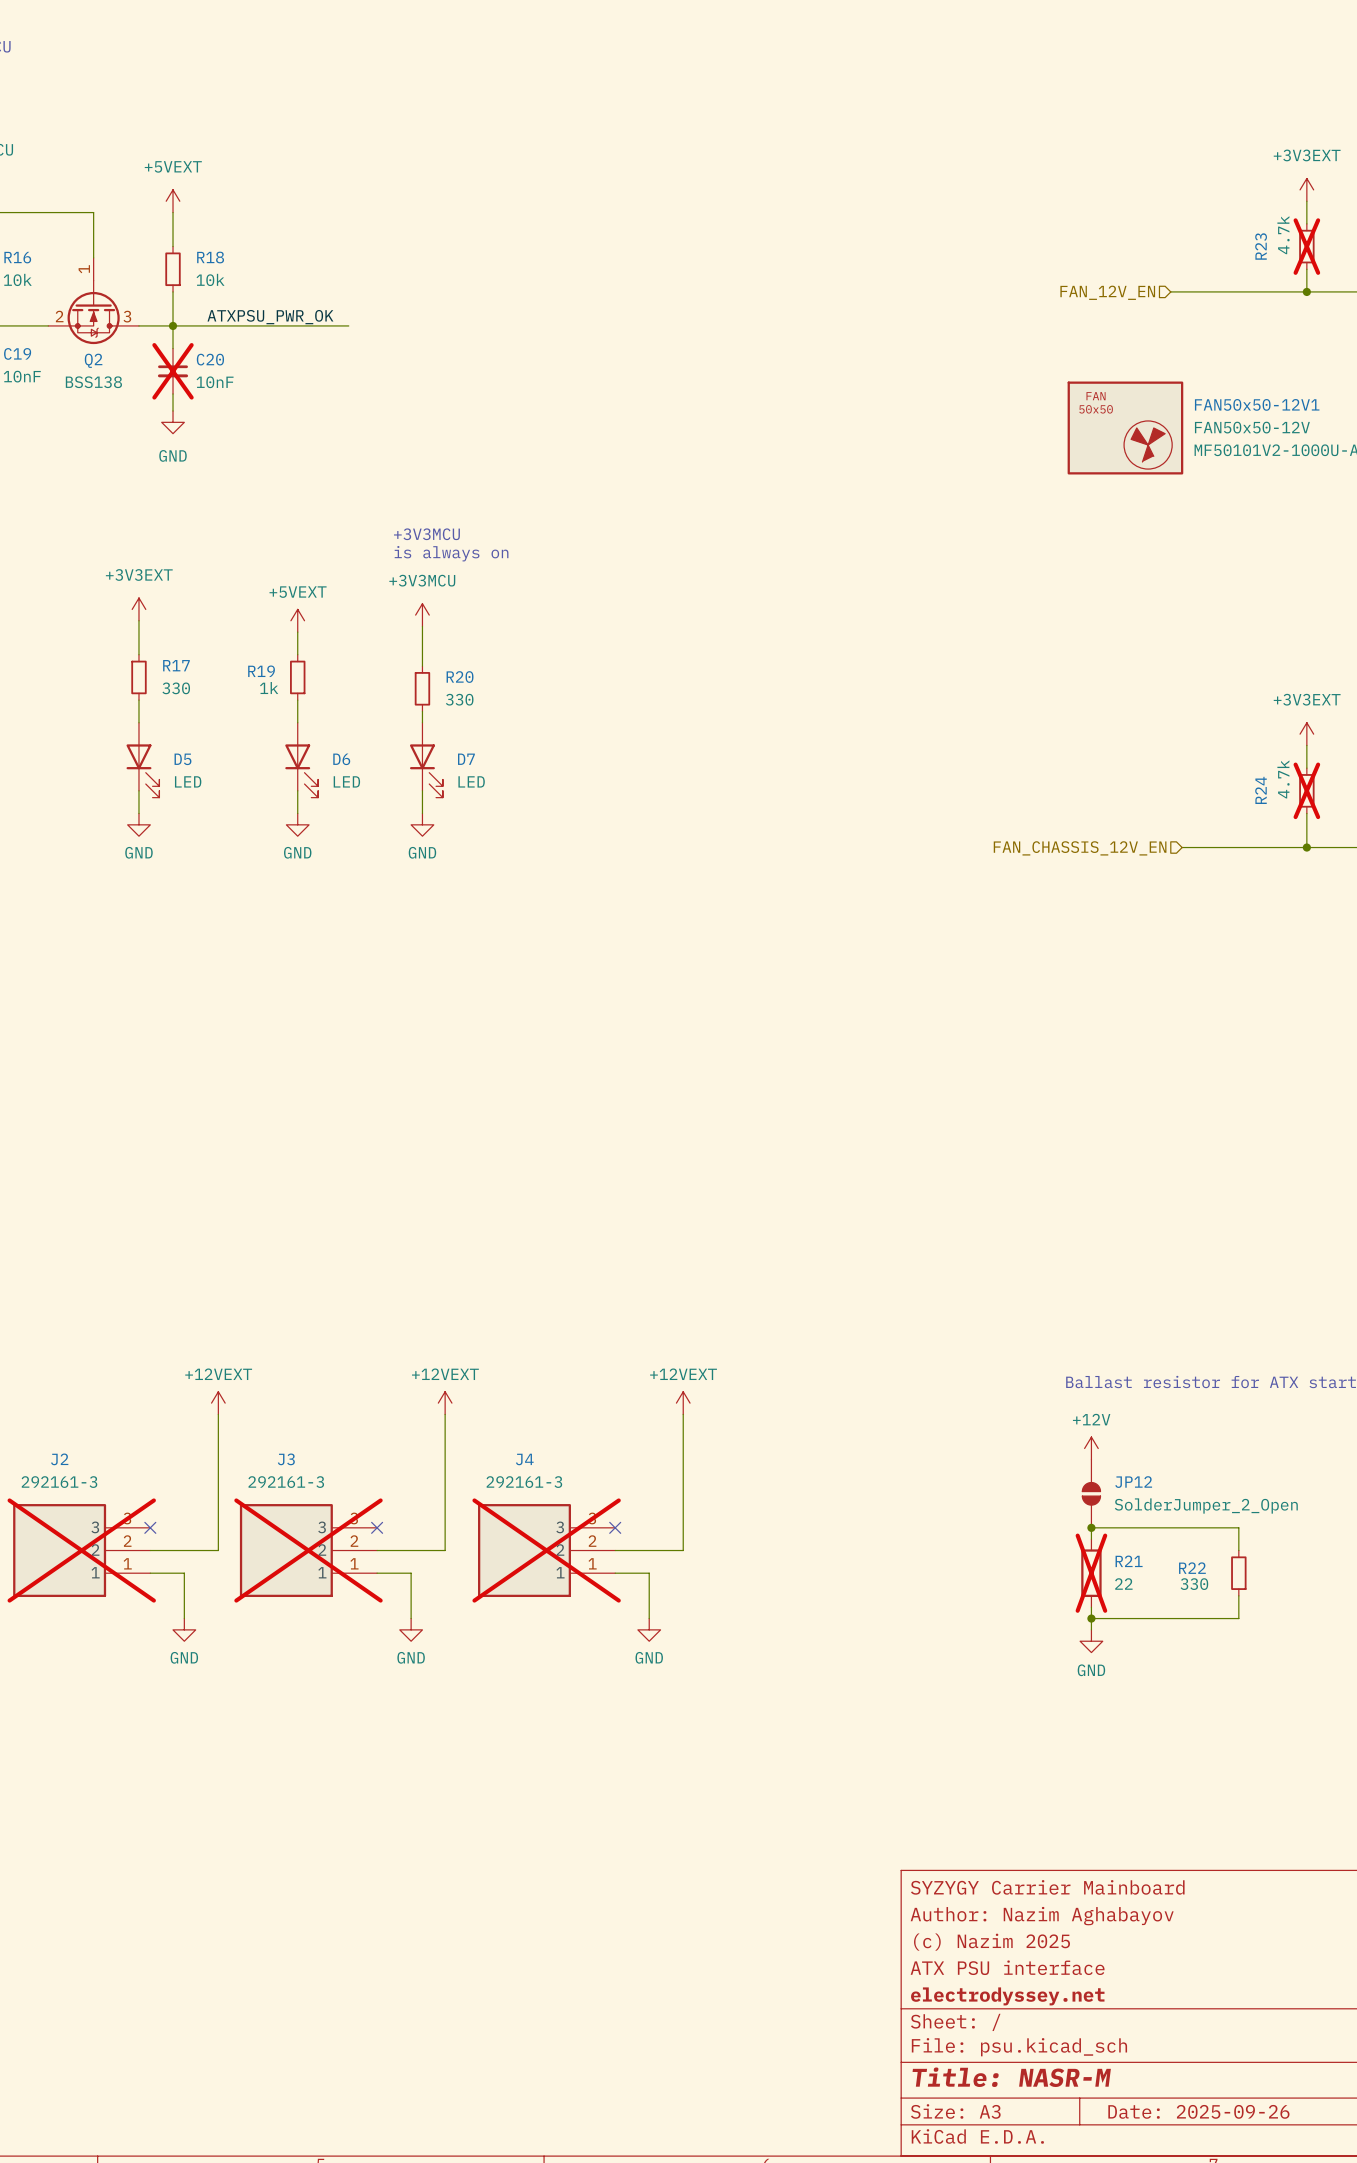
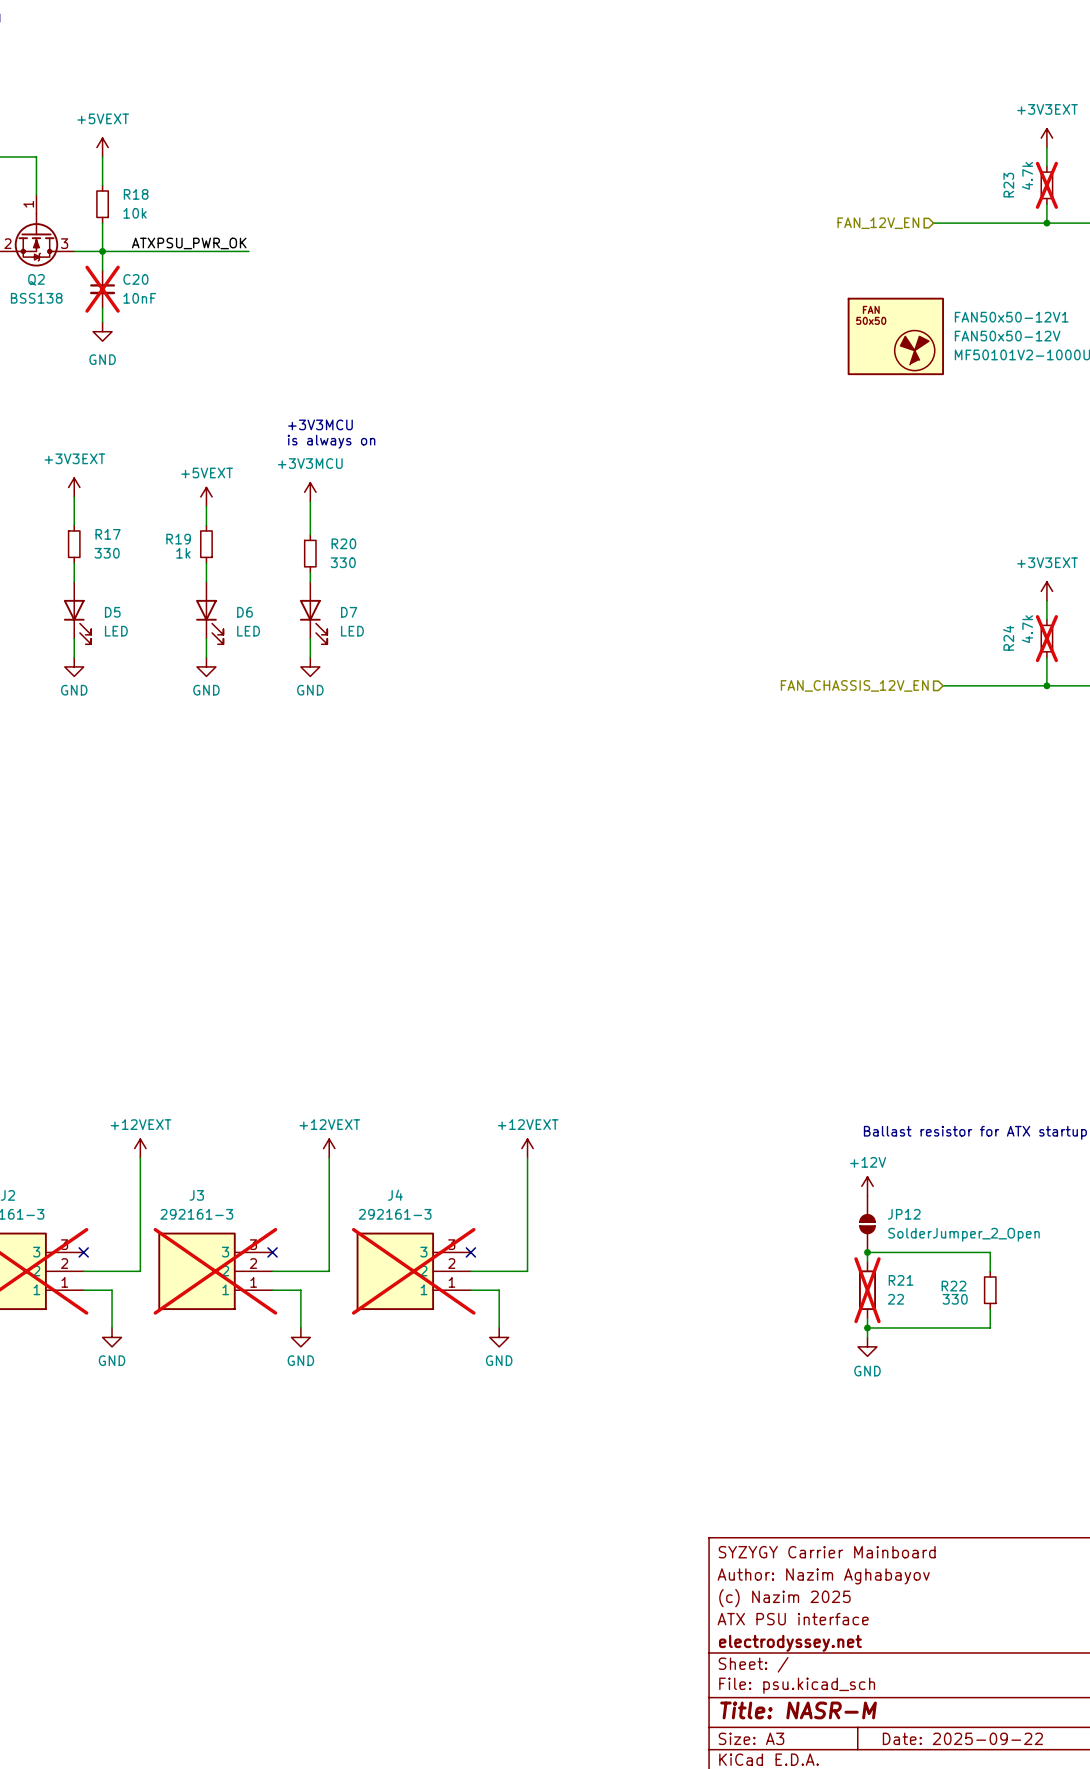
title block: Date: 2025-09-26 (1198, 2111) -> Date: 2025-09-22 (962, 1738)

